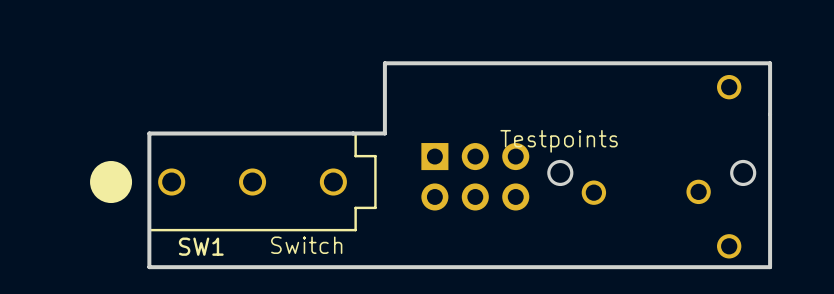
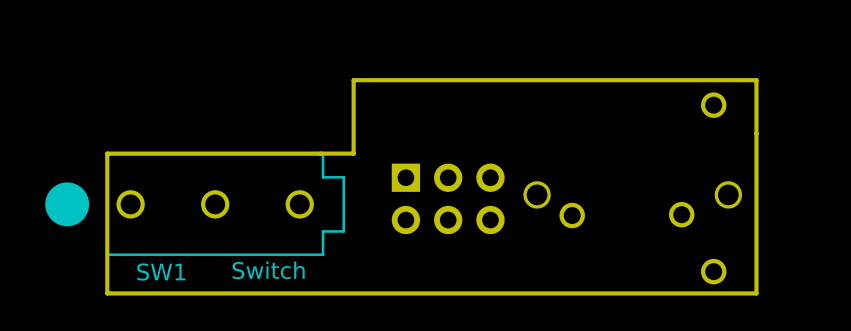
text: Testpoints (559, 141) -> none

